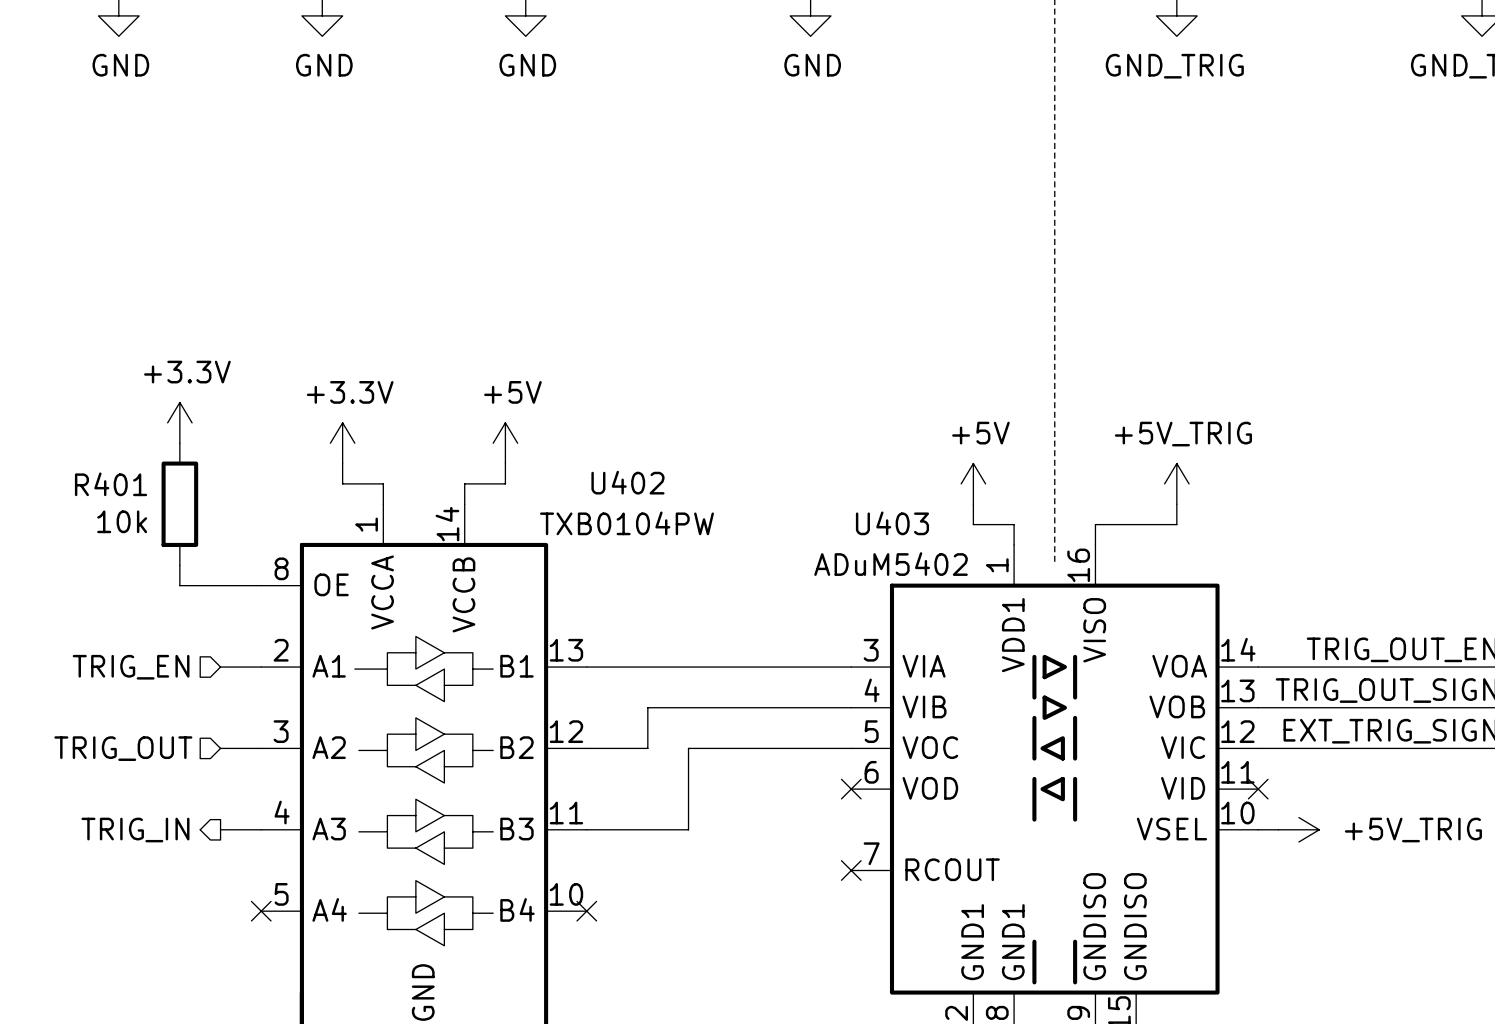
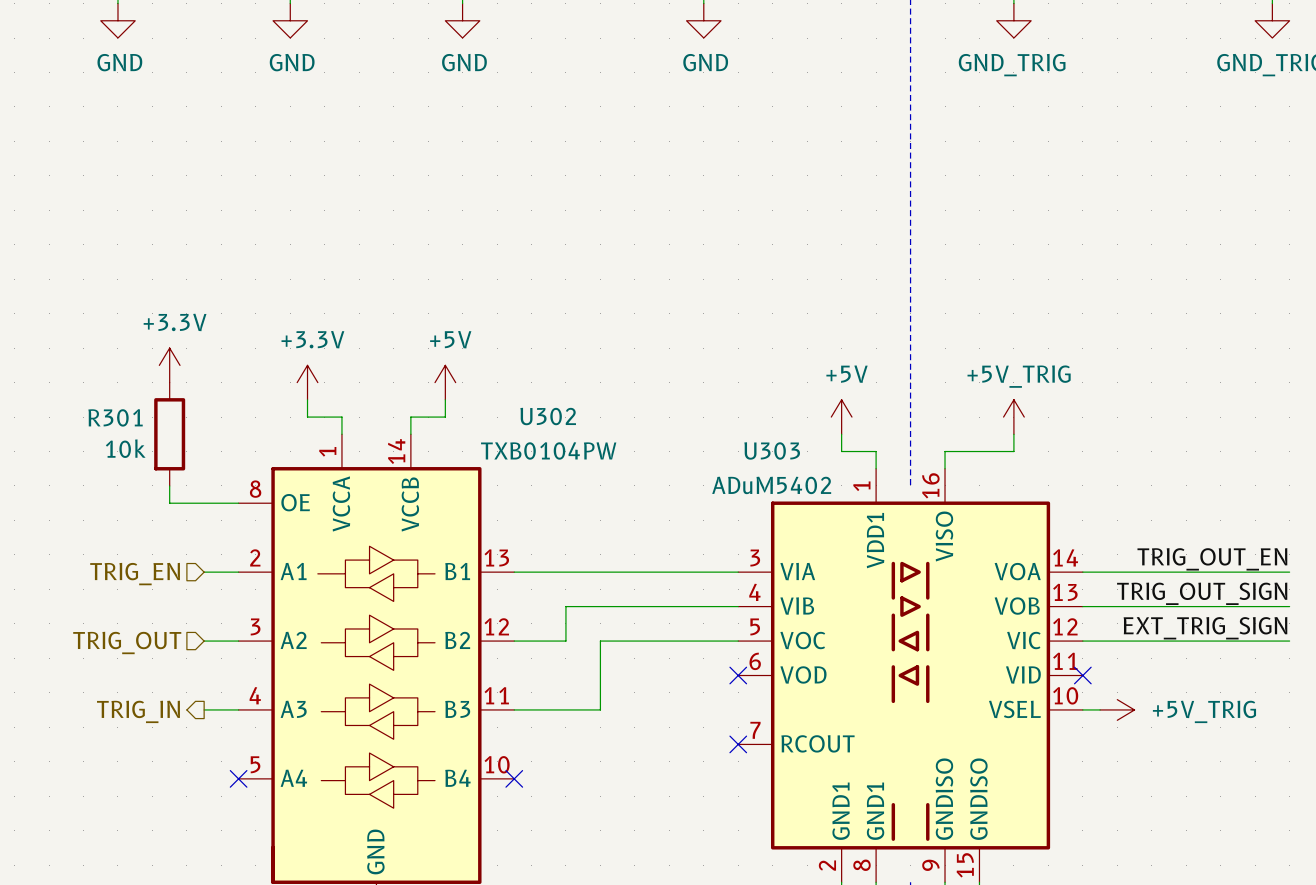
U402 name: U402 (627, 482) -> U302 (548, 416)
R401 name: R401 (111, 484) -> R301 (115, 417)
U403 name: U403 (892, 523) -> U303 (772, 450)

